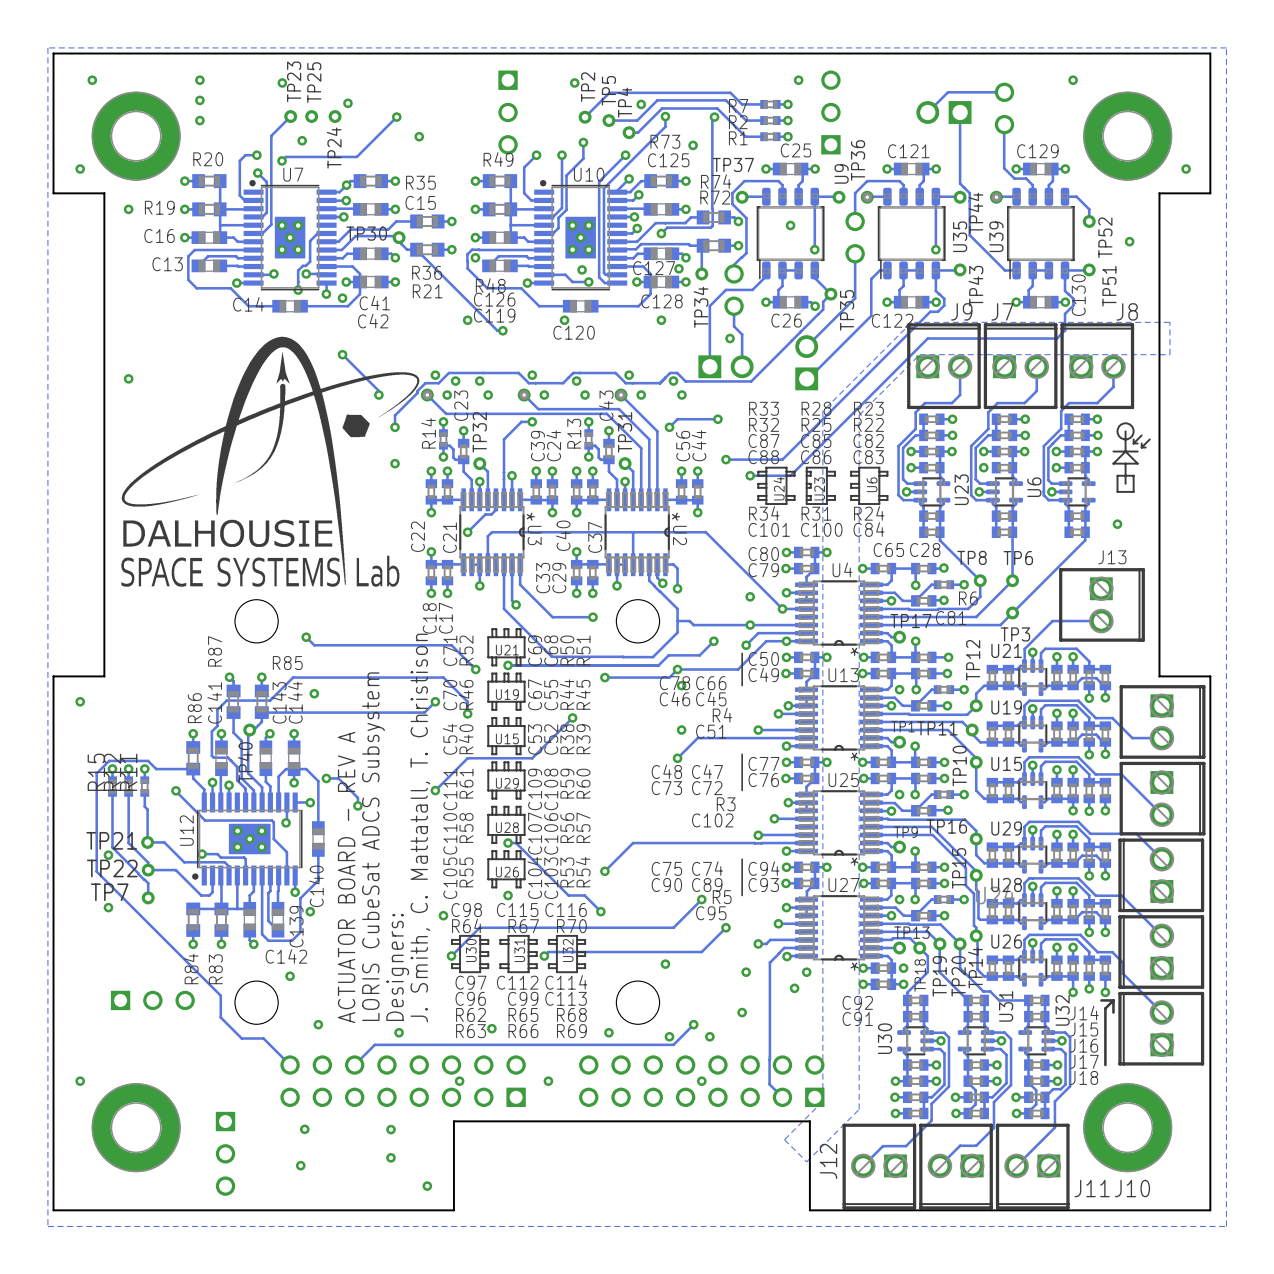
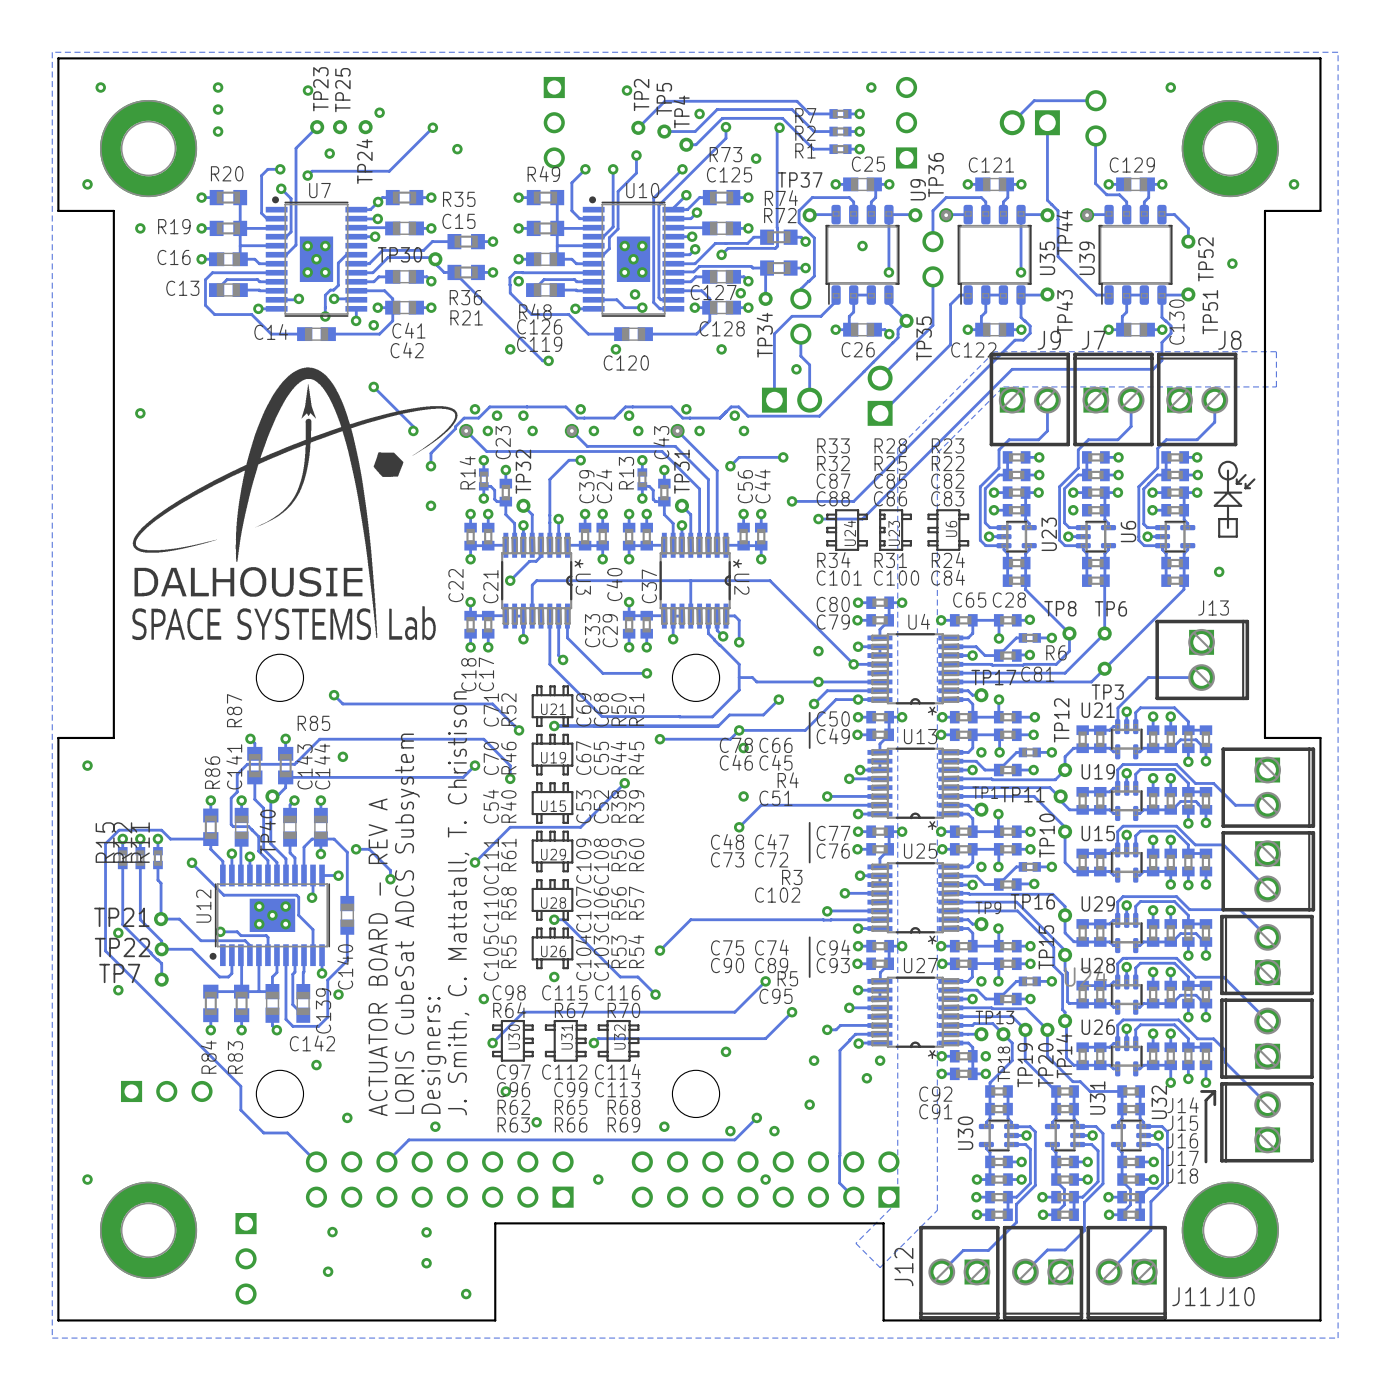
via: none -> (505, 1091)
via: (459, 1081) -> none

